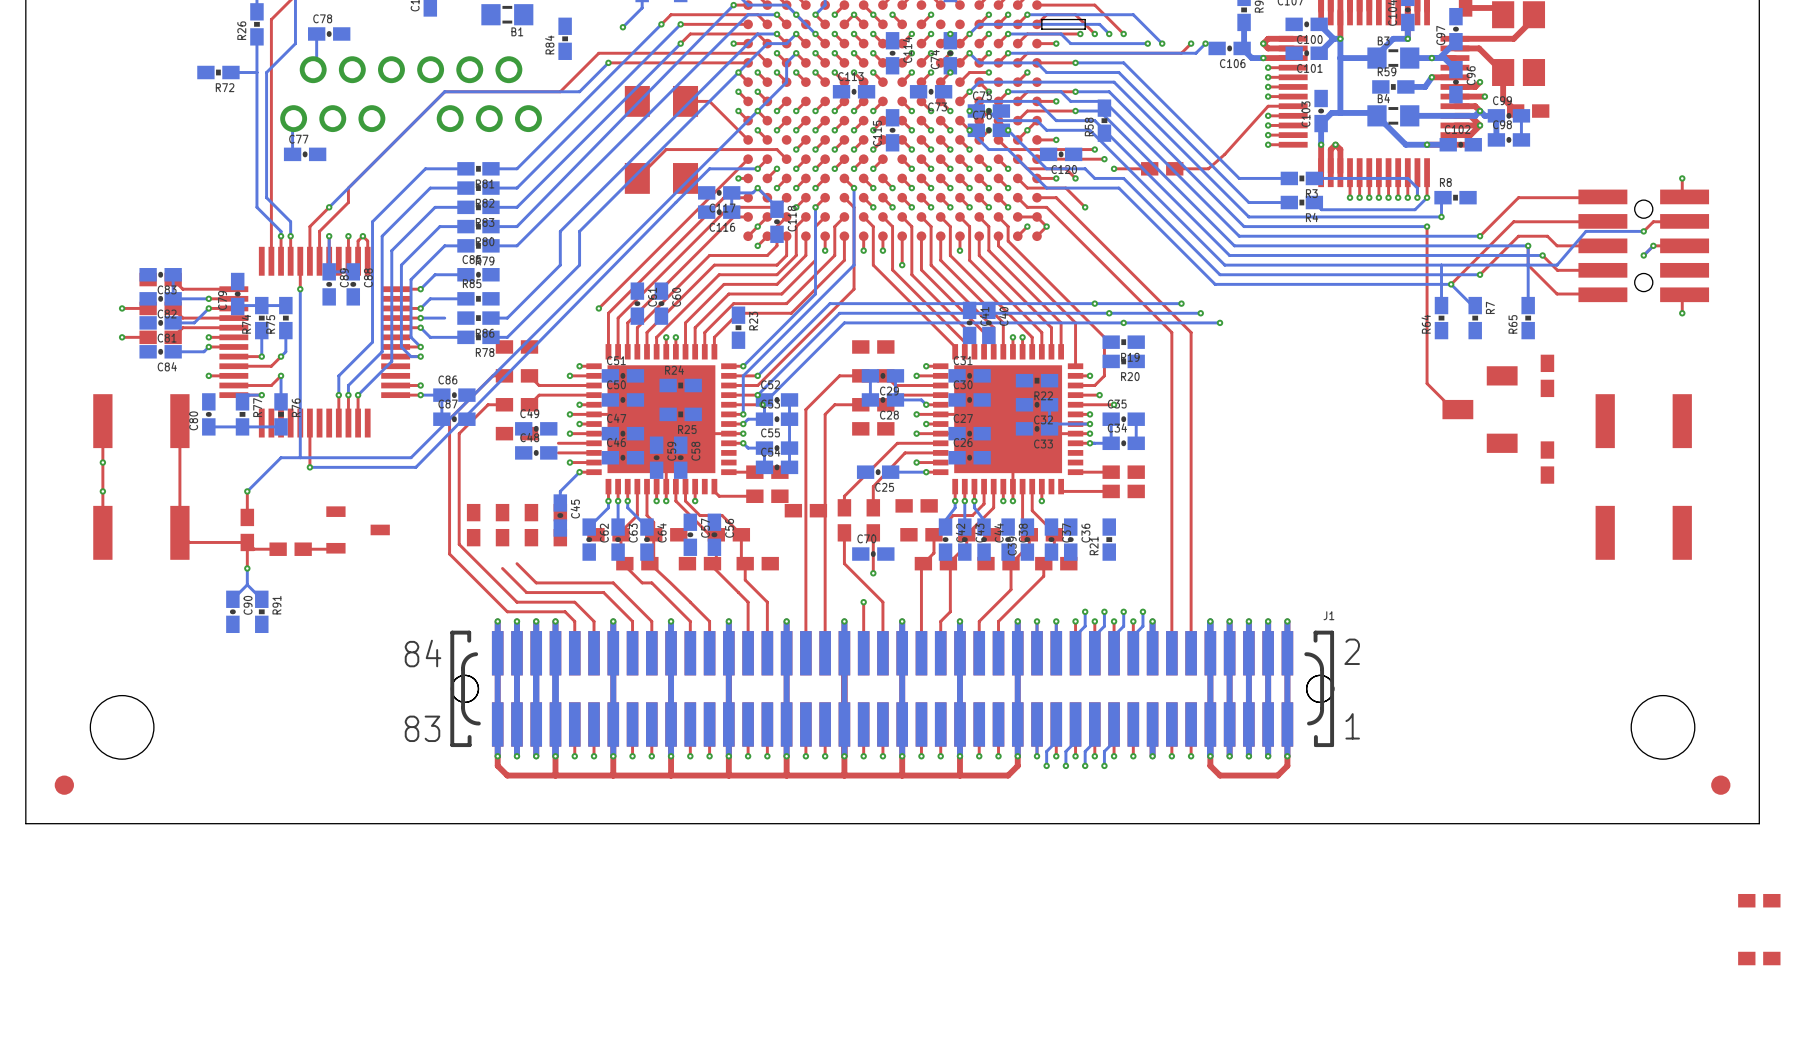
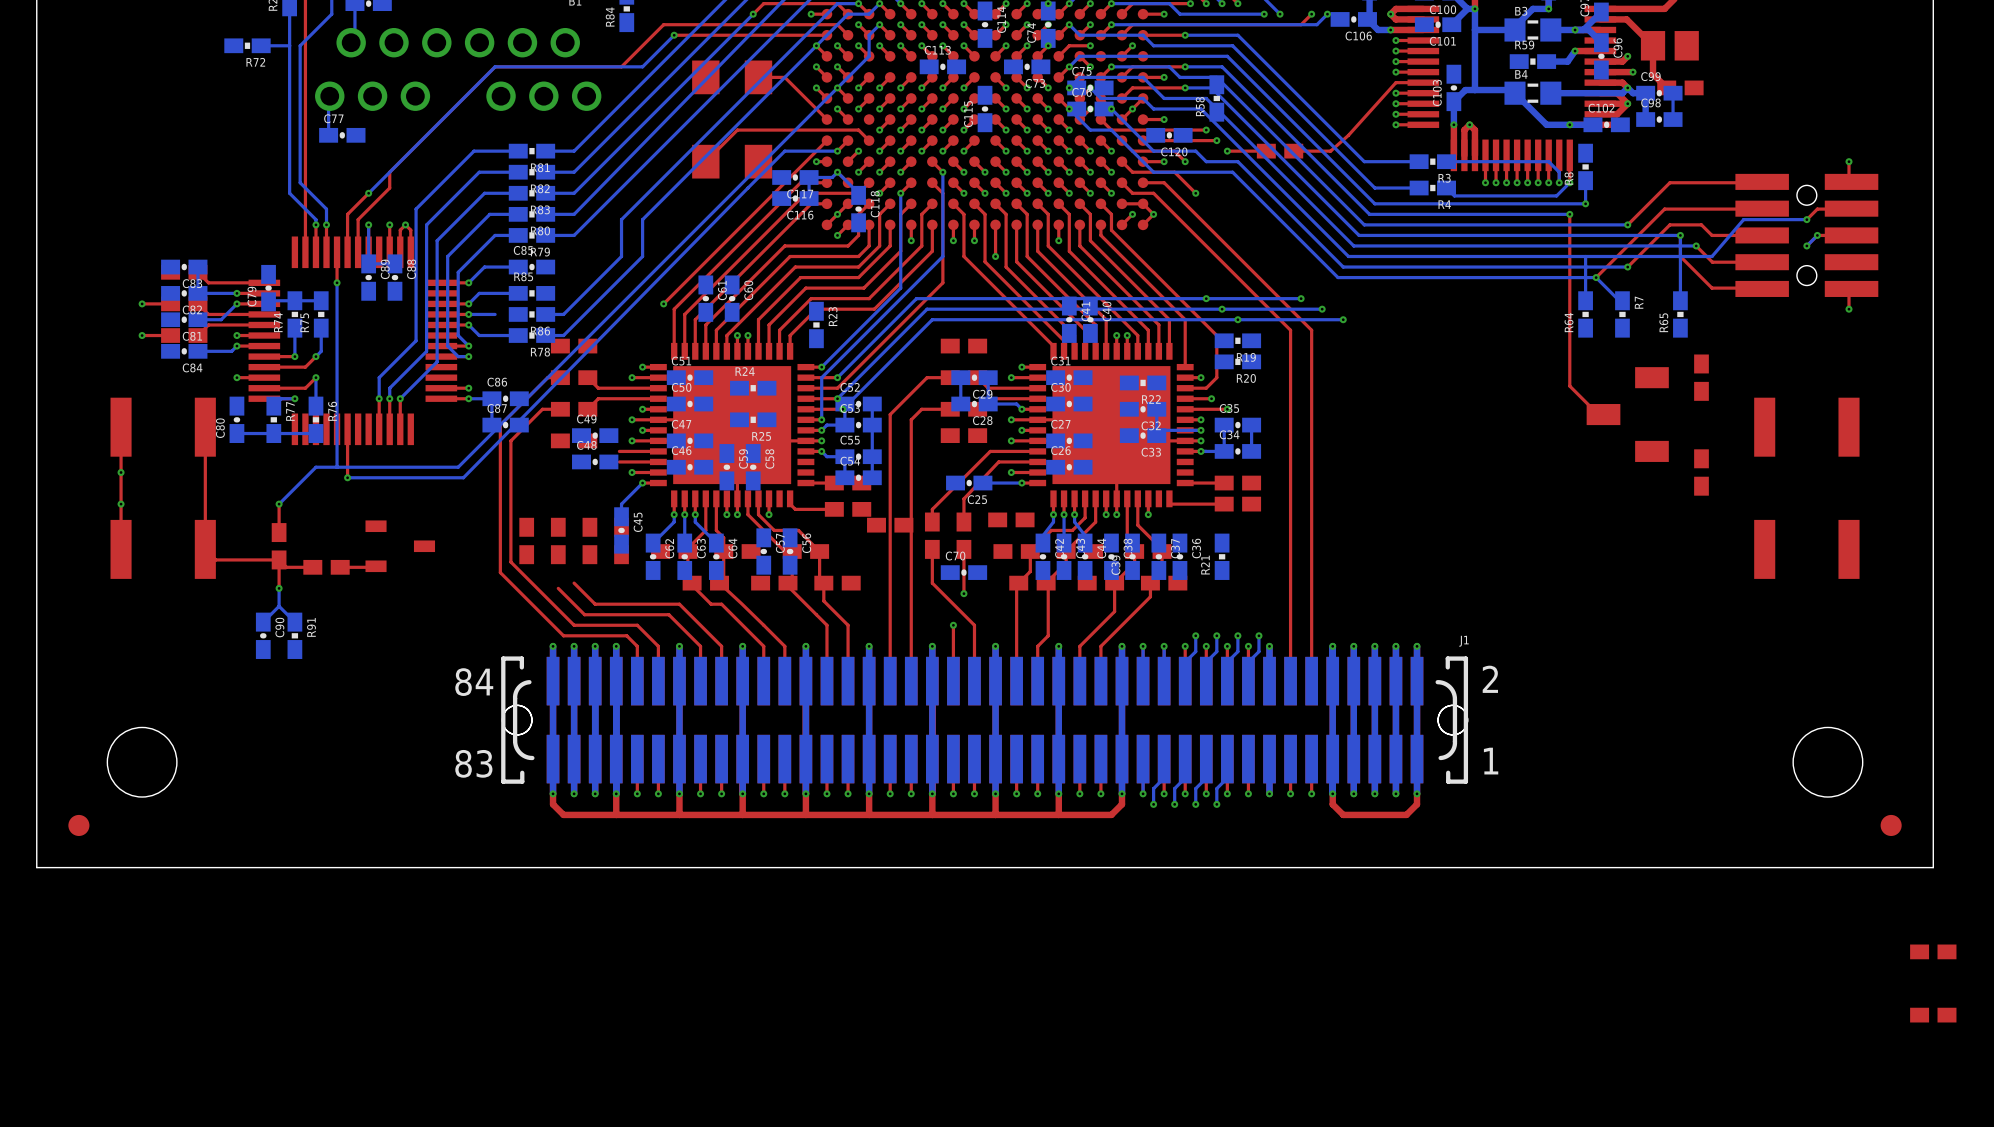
R8 rotation: 0° (1455, 197) -> 90° clockwise (1585, 166)

